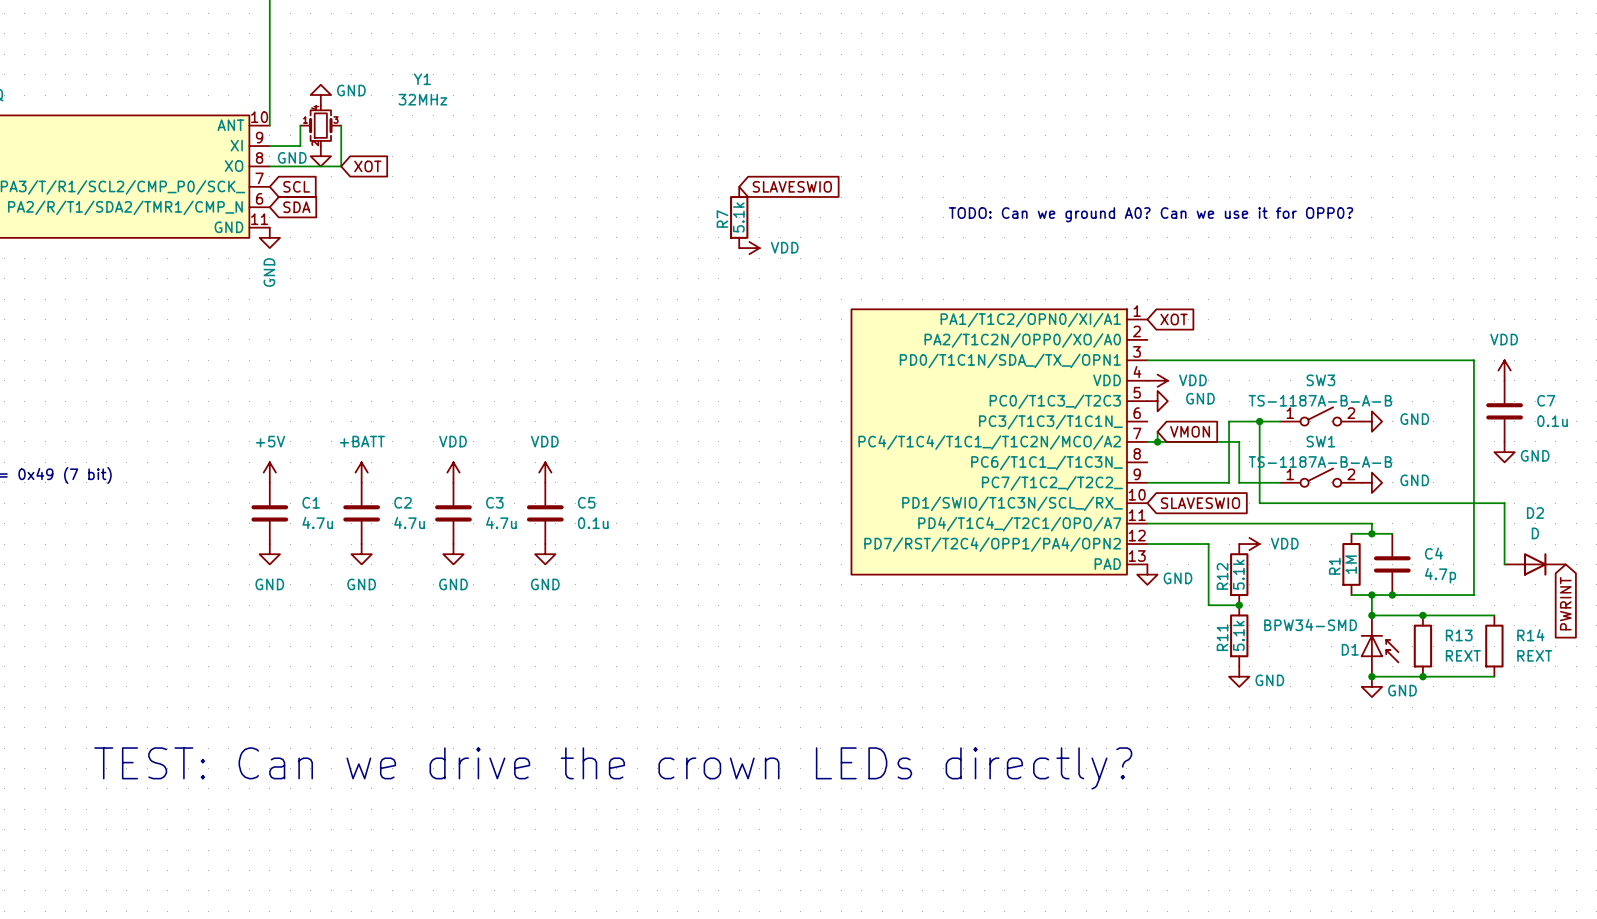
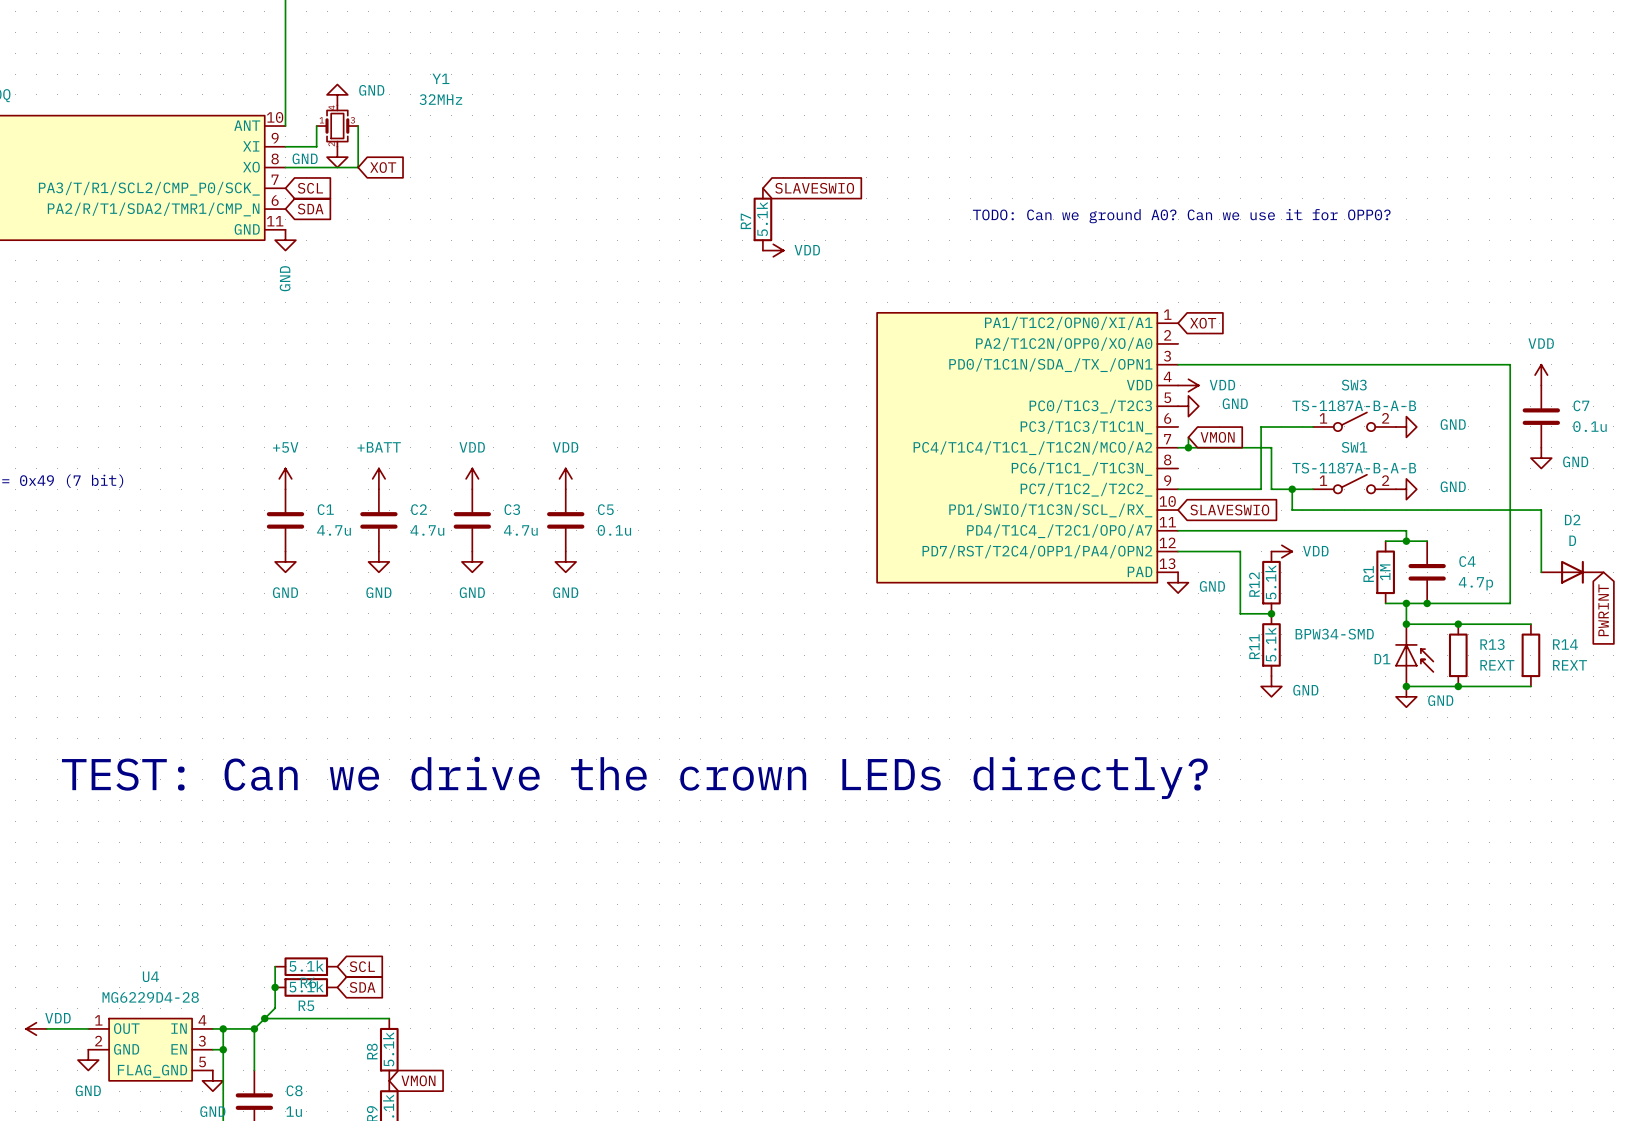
wire: (1259, 421) (1259, 482) -> none
junction: (1259, 421) -> none
junction: none -> (1292, 489)

